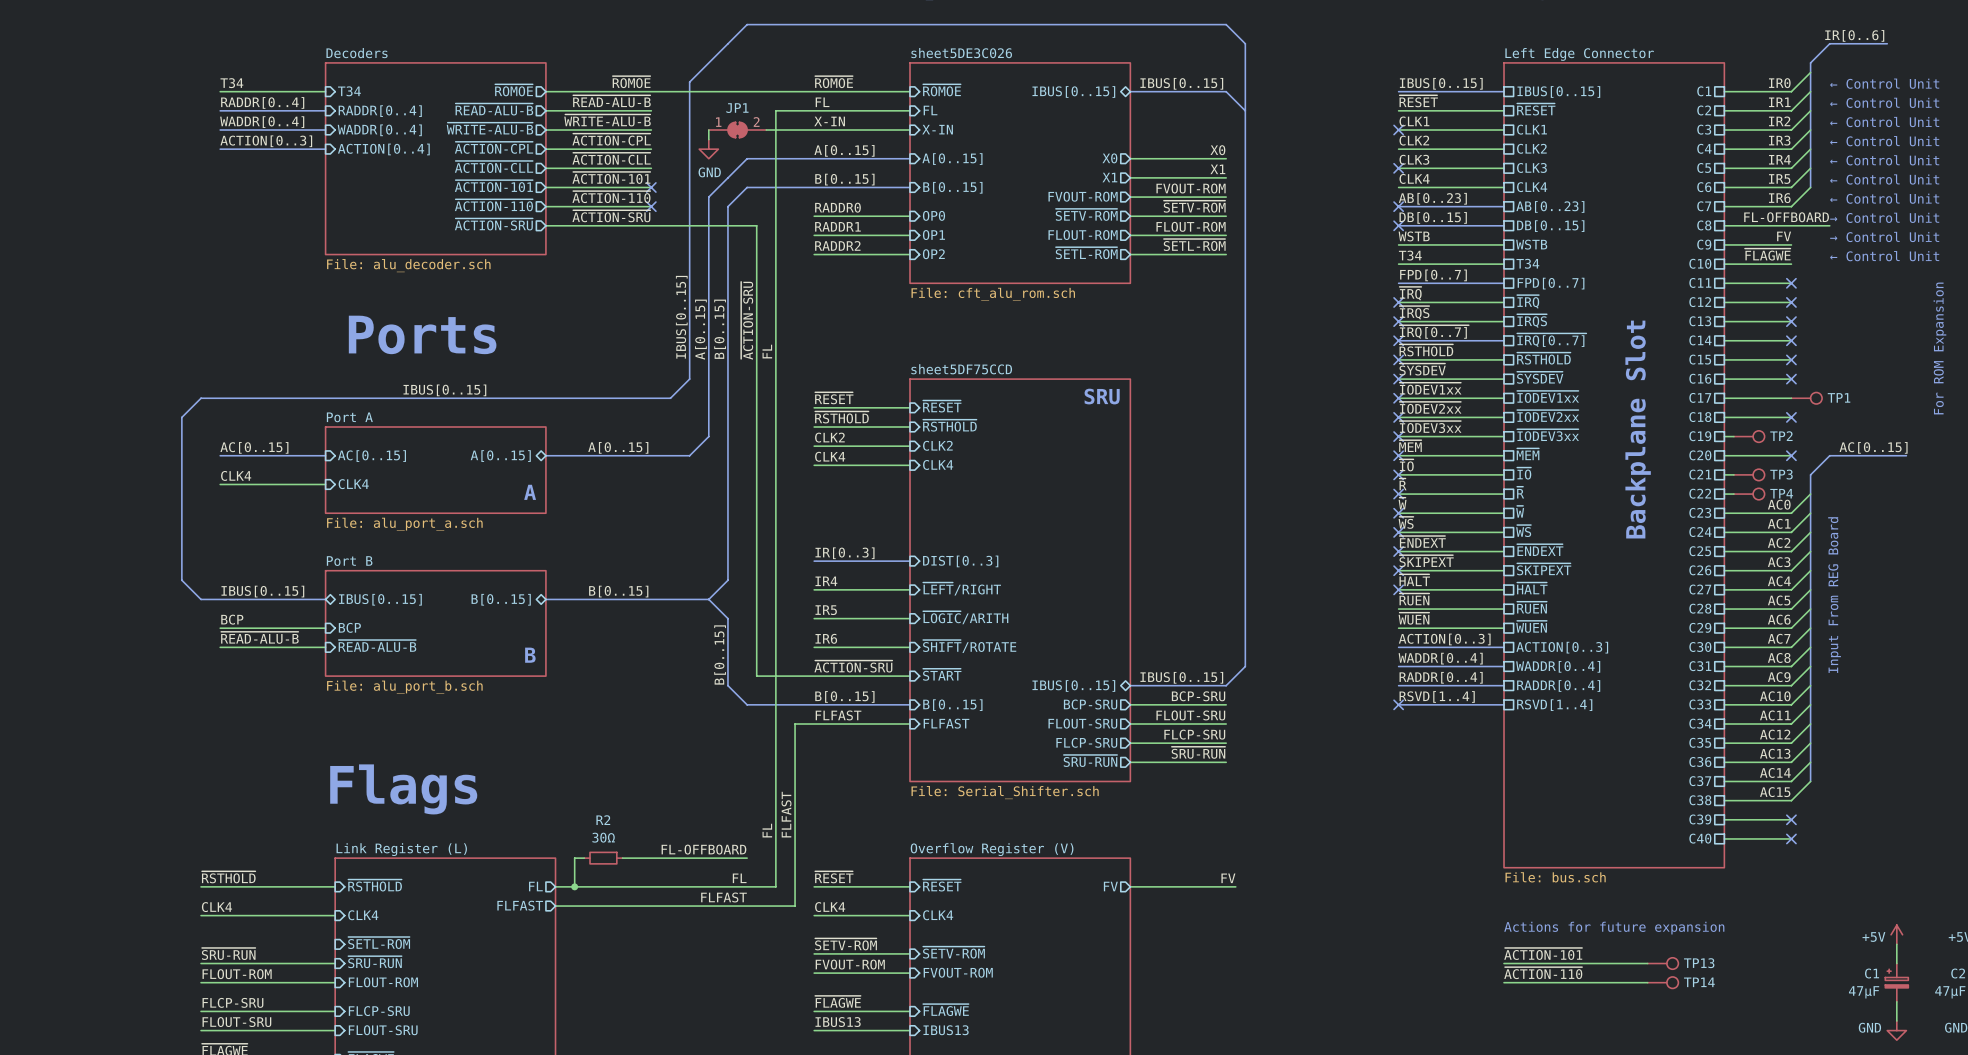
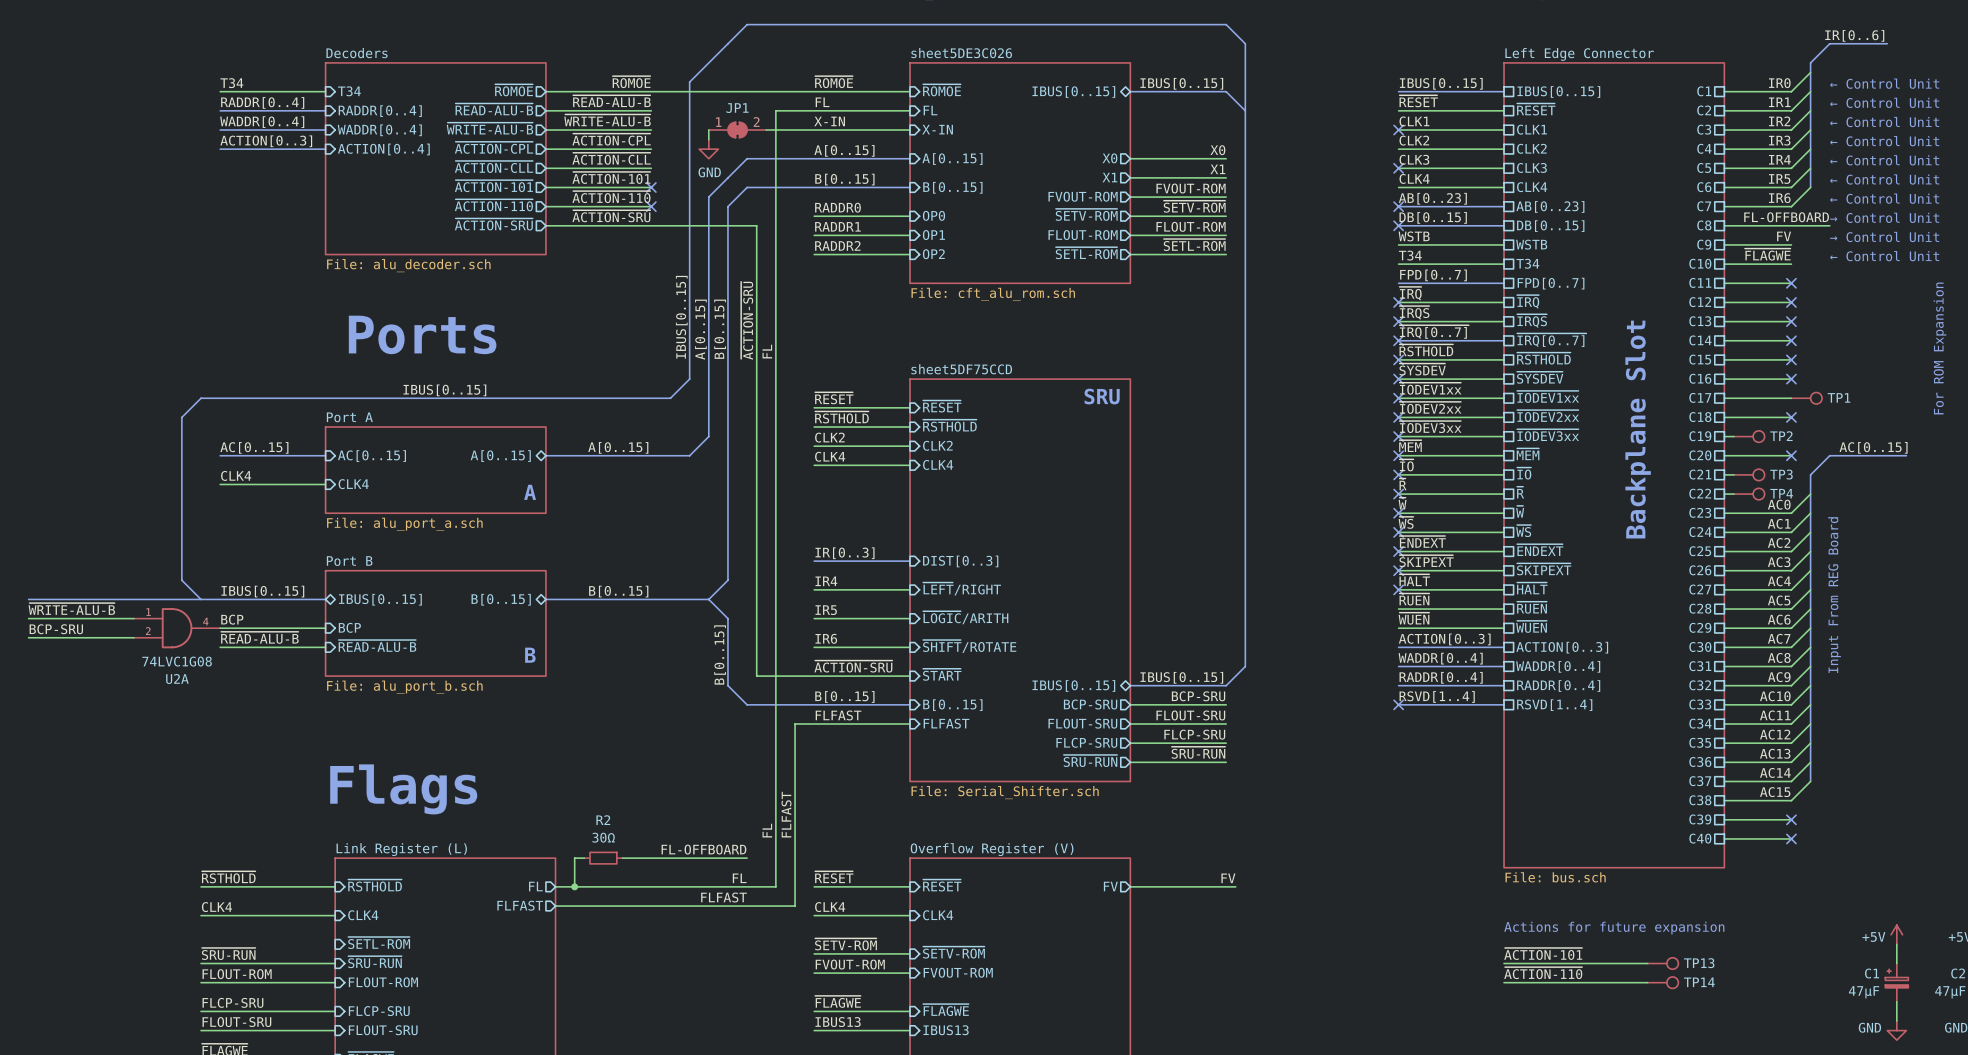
bus: none -> (28, 599) (201, 599)
label: none -> ~{WRITE-ALU-B} (71, 609)
wire: none -> (28, 618) (133, 618)
U2A: none -> 74LVC1G08 (177, 628)
label: none -> BCP-SRU (56, 629)
wire: none -> (28, 637) (133, 637)

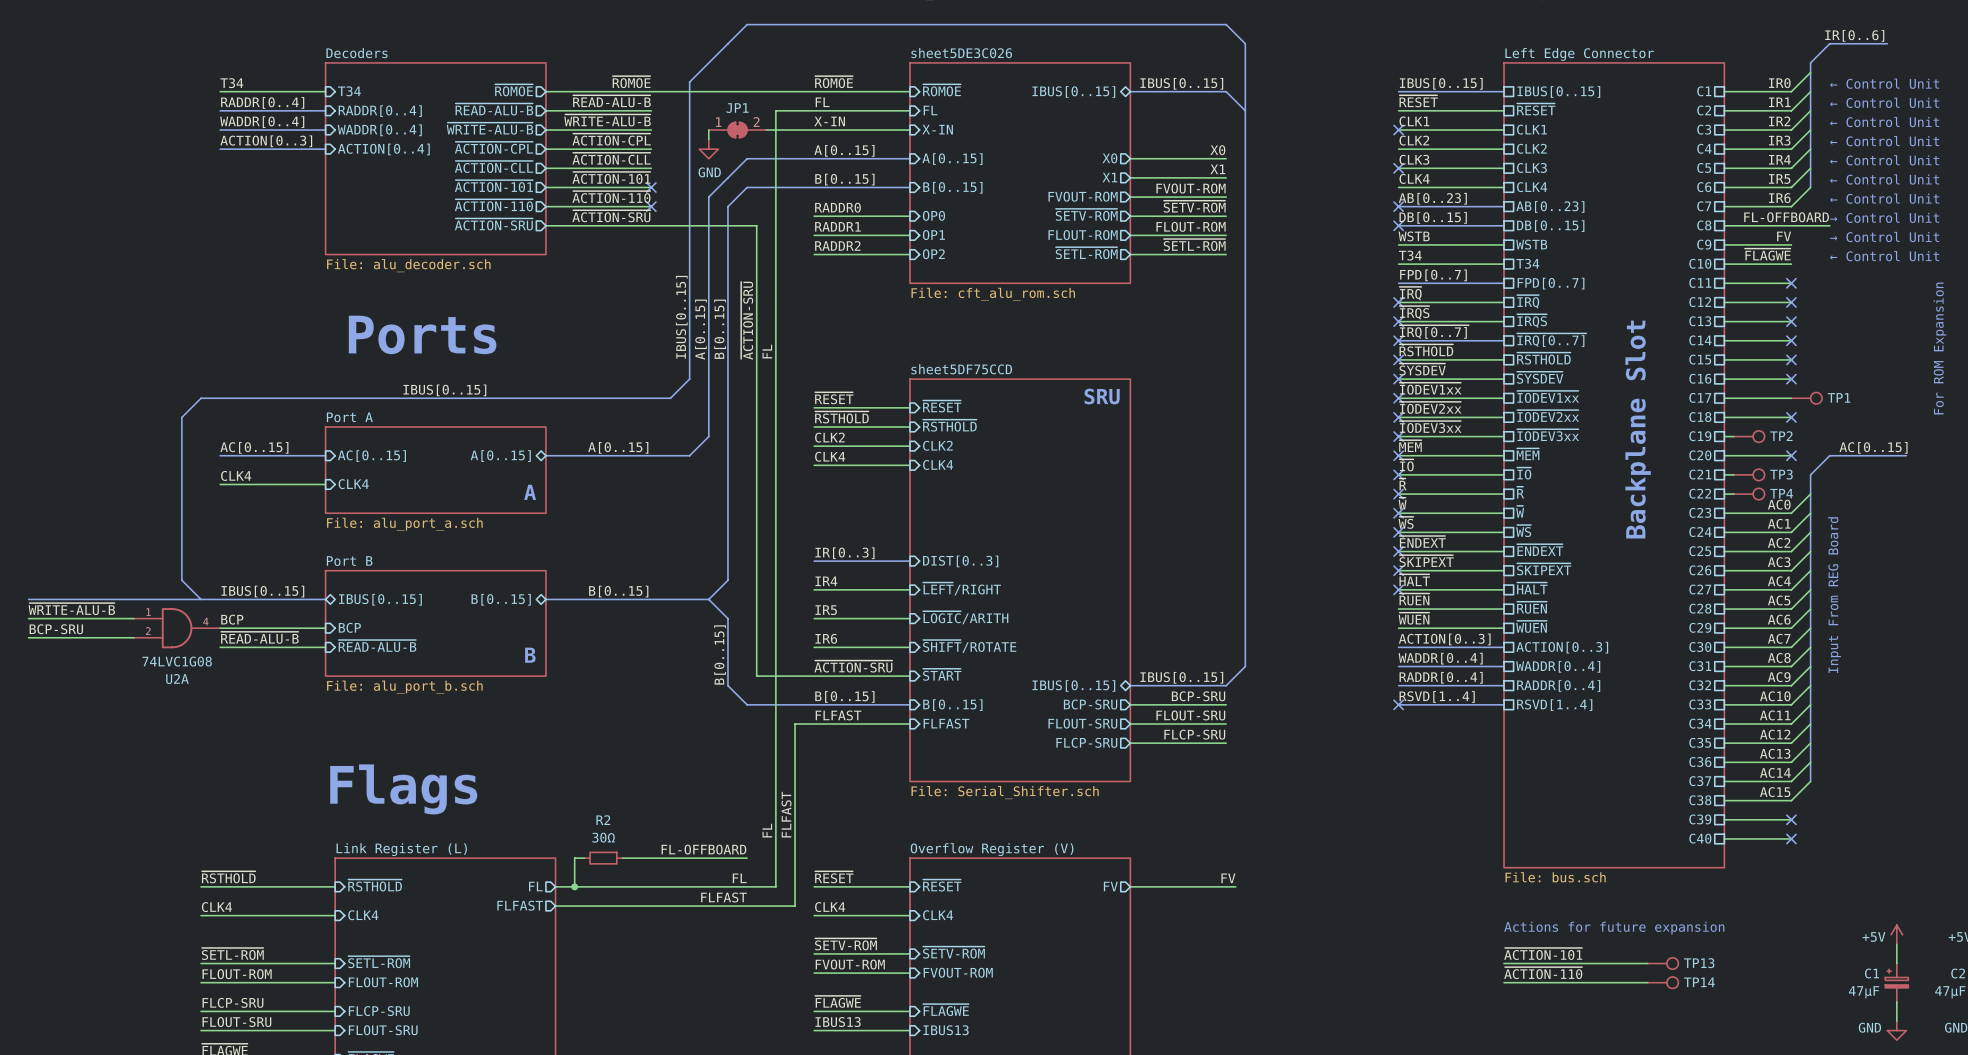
label: ~{SRU-RUN} (1198, 752) -> none
sheet pin: ~{SRU-RUN} (1090, 760) -> none
wire: (1130, 762) (1226, 762) -> none
sheet pin: ~{SETL-ROM} (379, 942) -> none
label: ~{SRU-RUN} (228, 953) -> ~{SETL-ROM} (232, 953)
sheet pin: ~{SRU-RUN} (375, 962) -> ~{SETL-ROM} (379, 962)

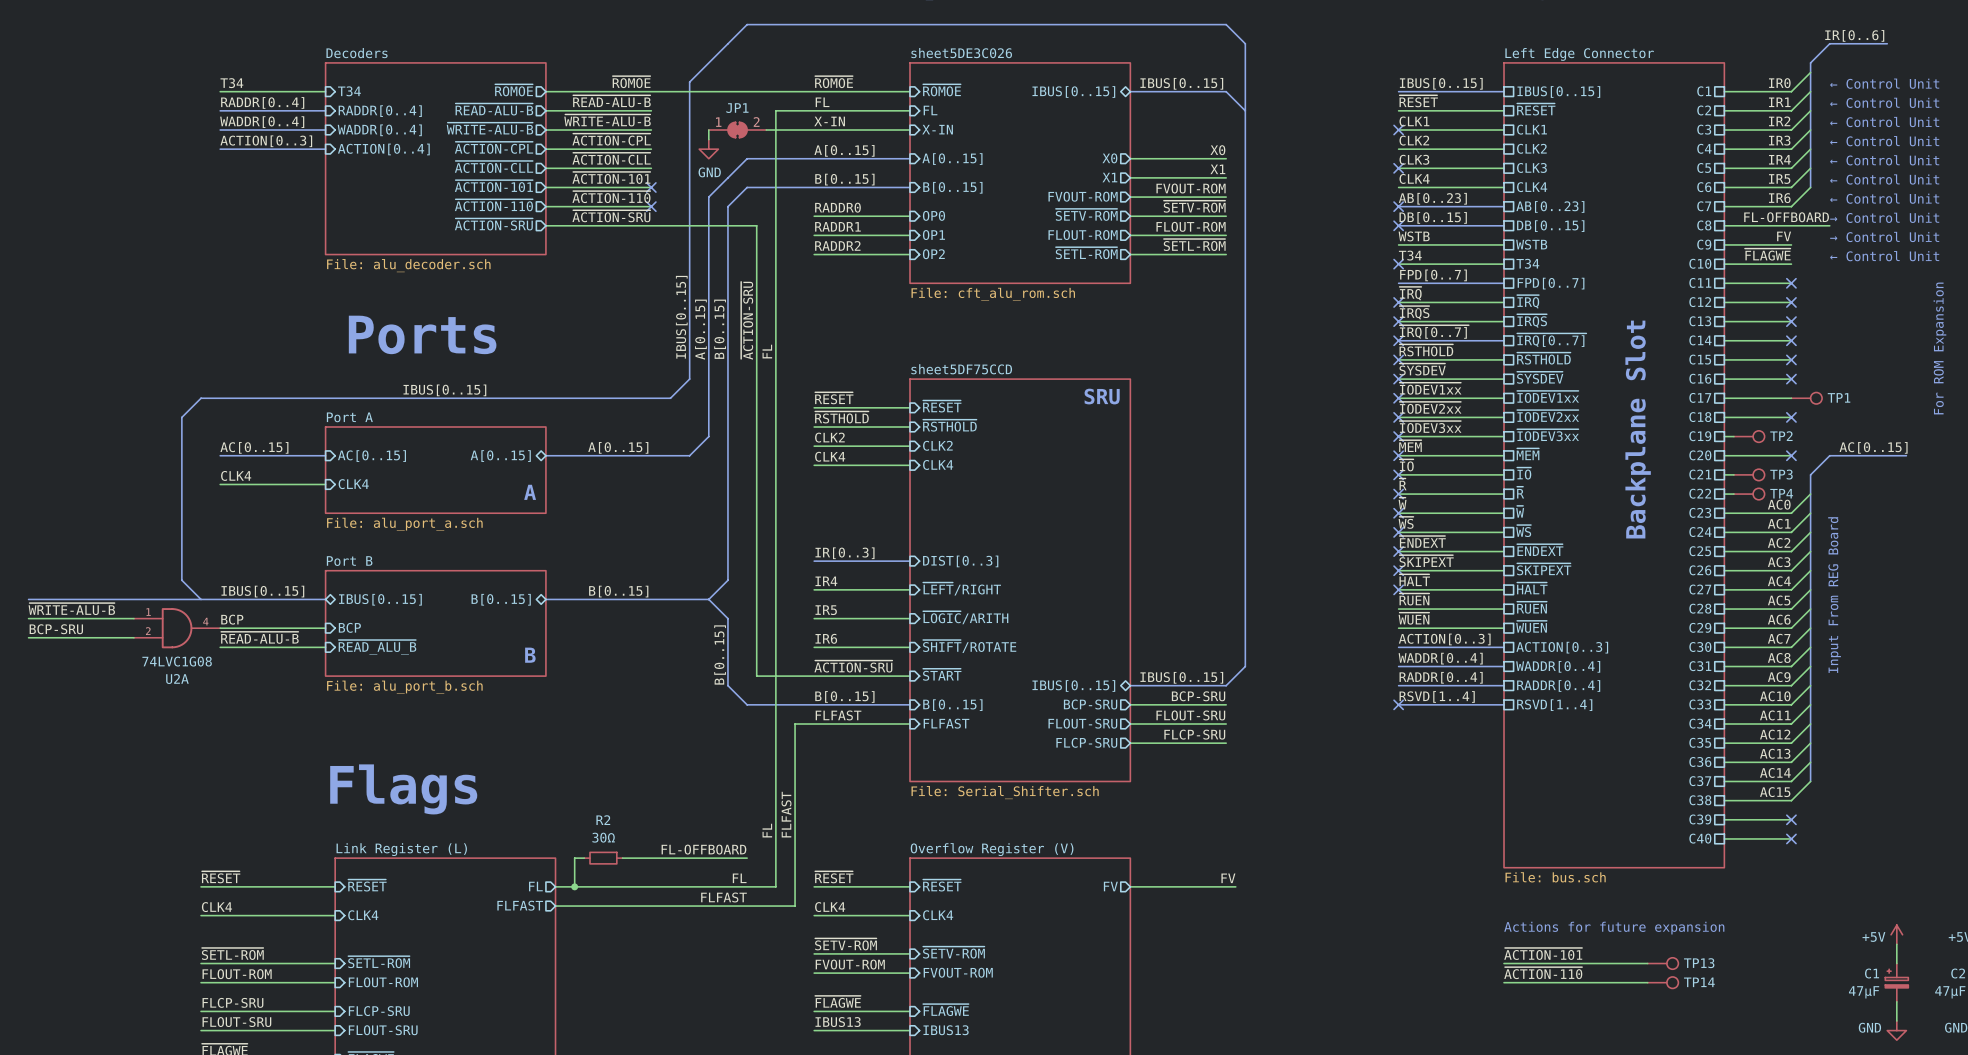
no-connect mark: none -> (1398, 264)
sheet pin: ~{READ-ALU-B} (377, 645) -> ~{READ_ALU_B} (377, 647)
label: ~{RSTHOLD} (228, 877) -> ~{RESET} (221, 877)
sheet pin: ~{RSTHOLD} (375, 885) -> ~{RESET} (367, 885)

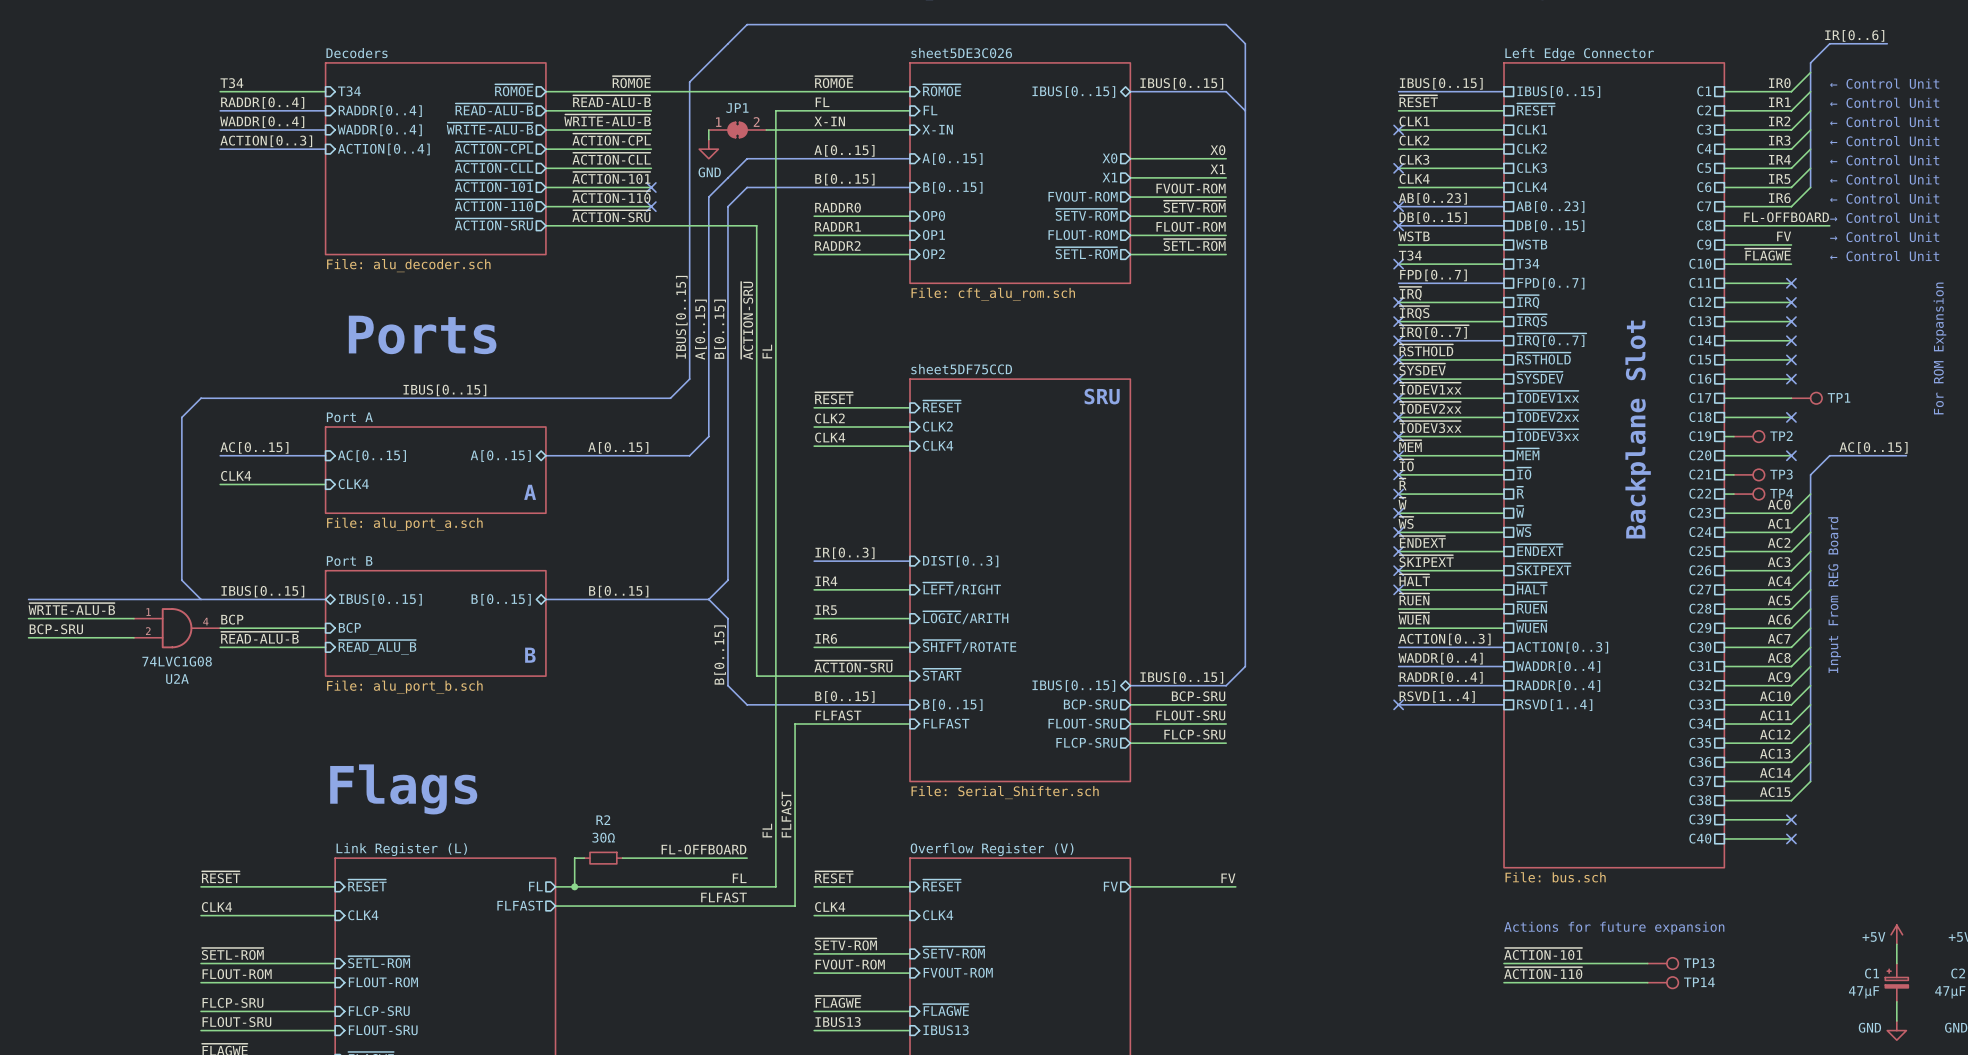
label: ~{RSTHOLD} (841, 417) -> CLK2 (829, 418)
sheet pin: ~{RSTHOLD} (949, 425) -> CLK2 (937, 426)
label: CLK2 (829, 437) -> CLK4 (830, 437)
sheet pin: CLK2 (937, 445) -> CLK4 (938, 445)
label: CLK4 (830, 456) -> none
sheet pin: CLK4 (938, 464) -> none
wire: (814, 465) (910, 465) -> none

